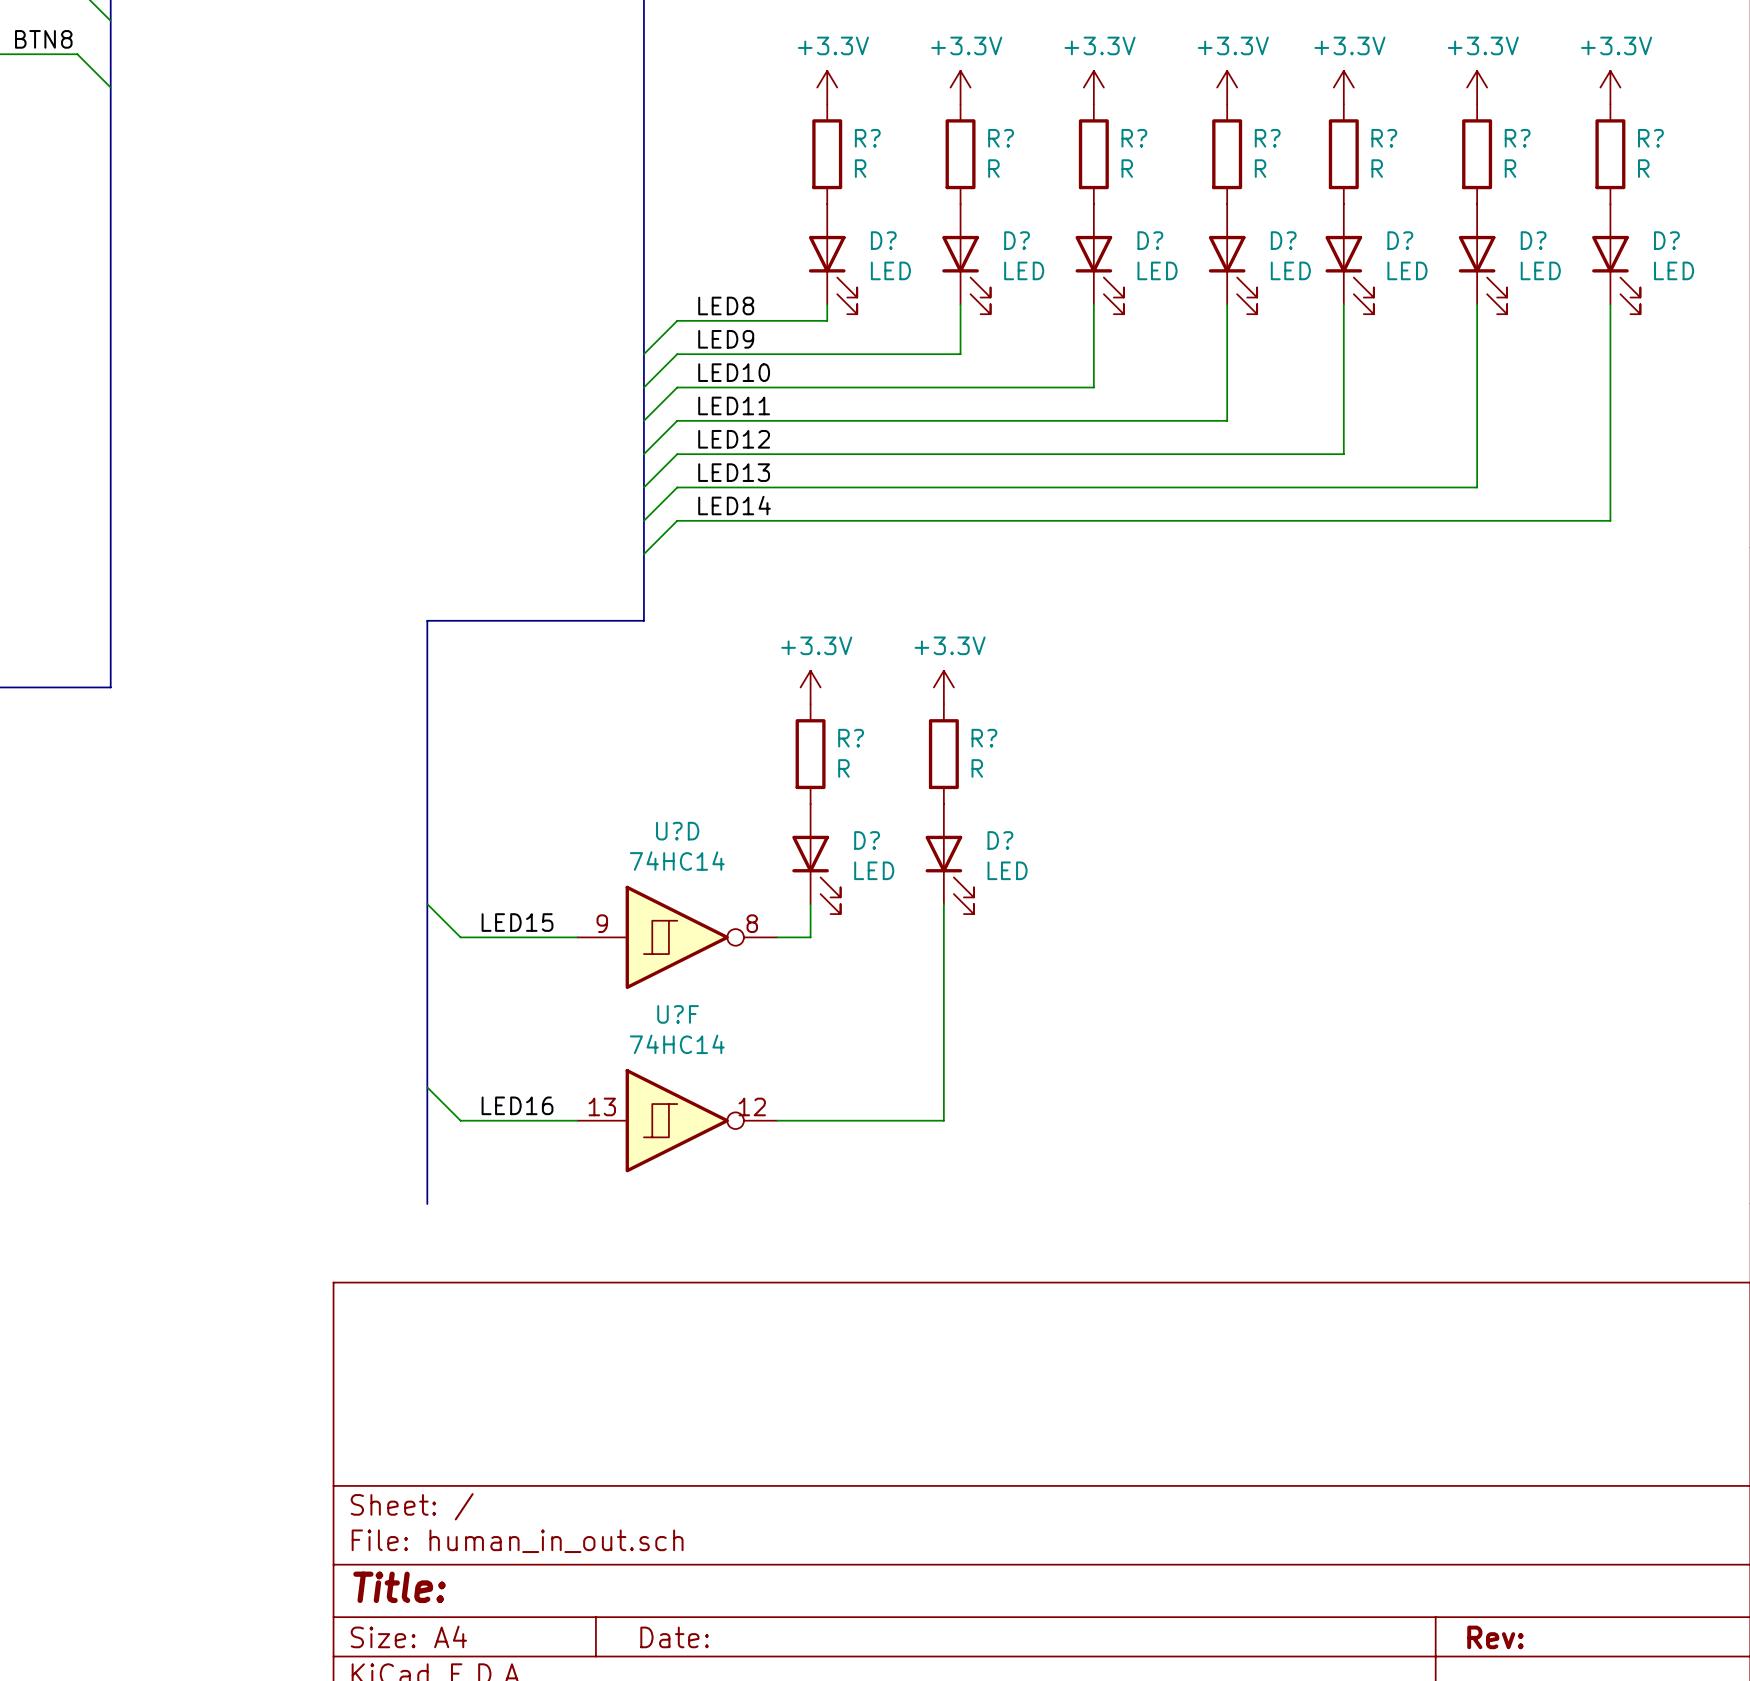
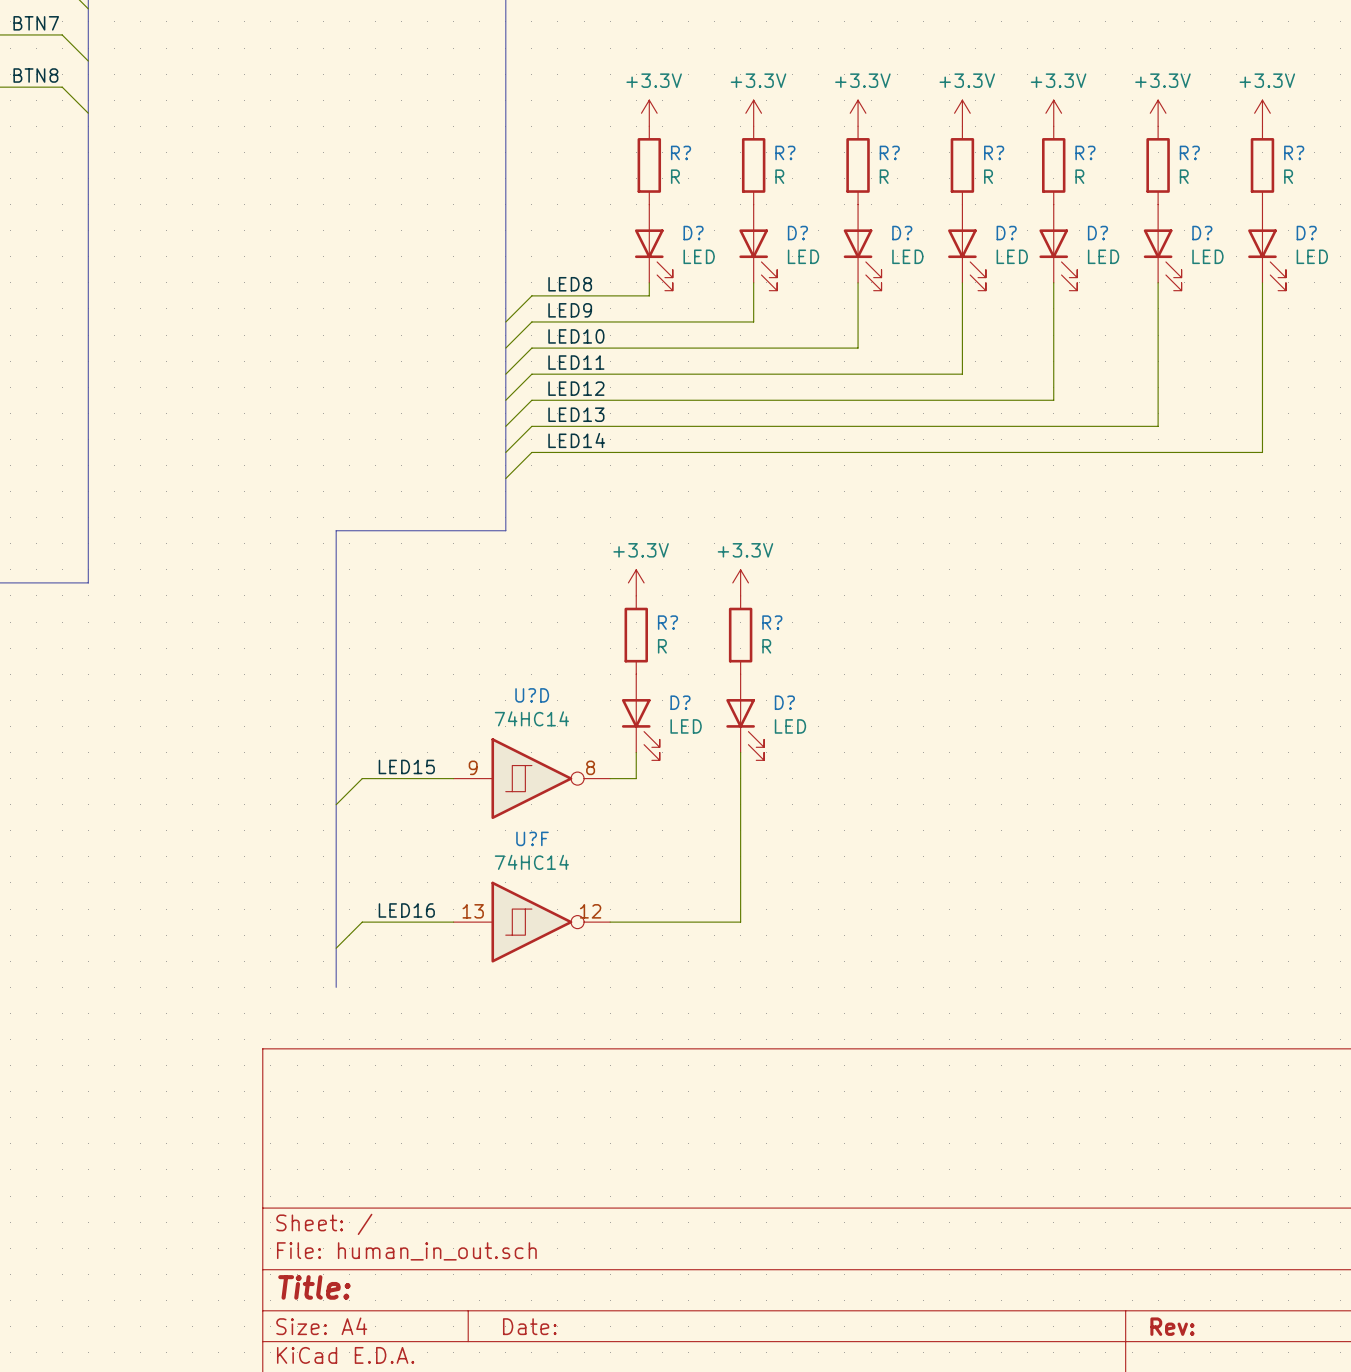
wire: (427, 904) (460, 937) -> (336, 804) (362, 778)
wire: (427, 1087) (460, 1120) -> (336, 948) (362, 922)

